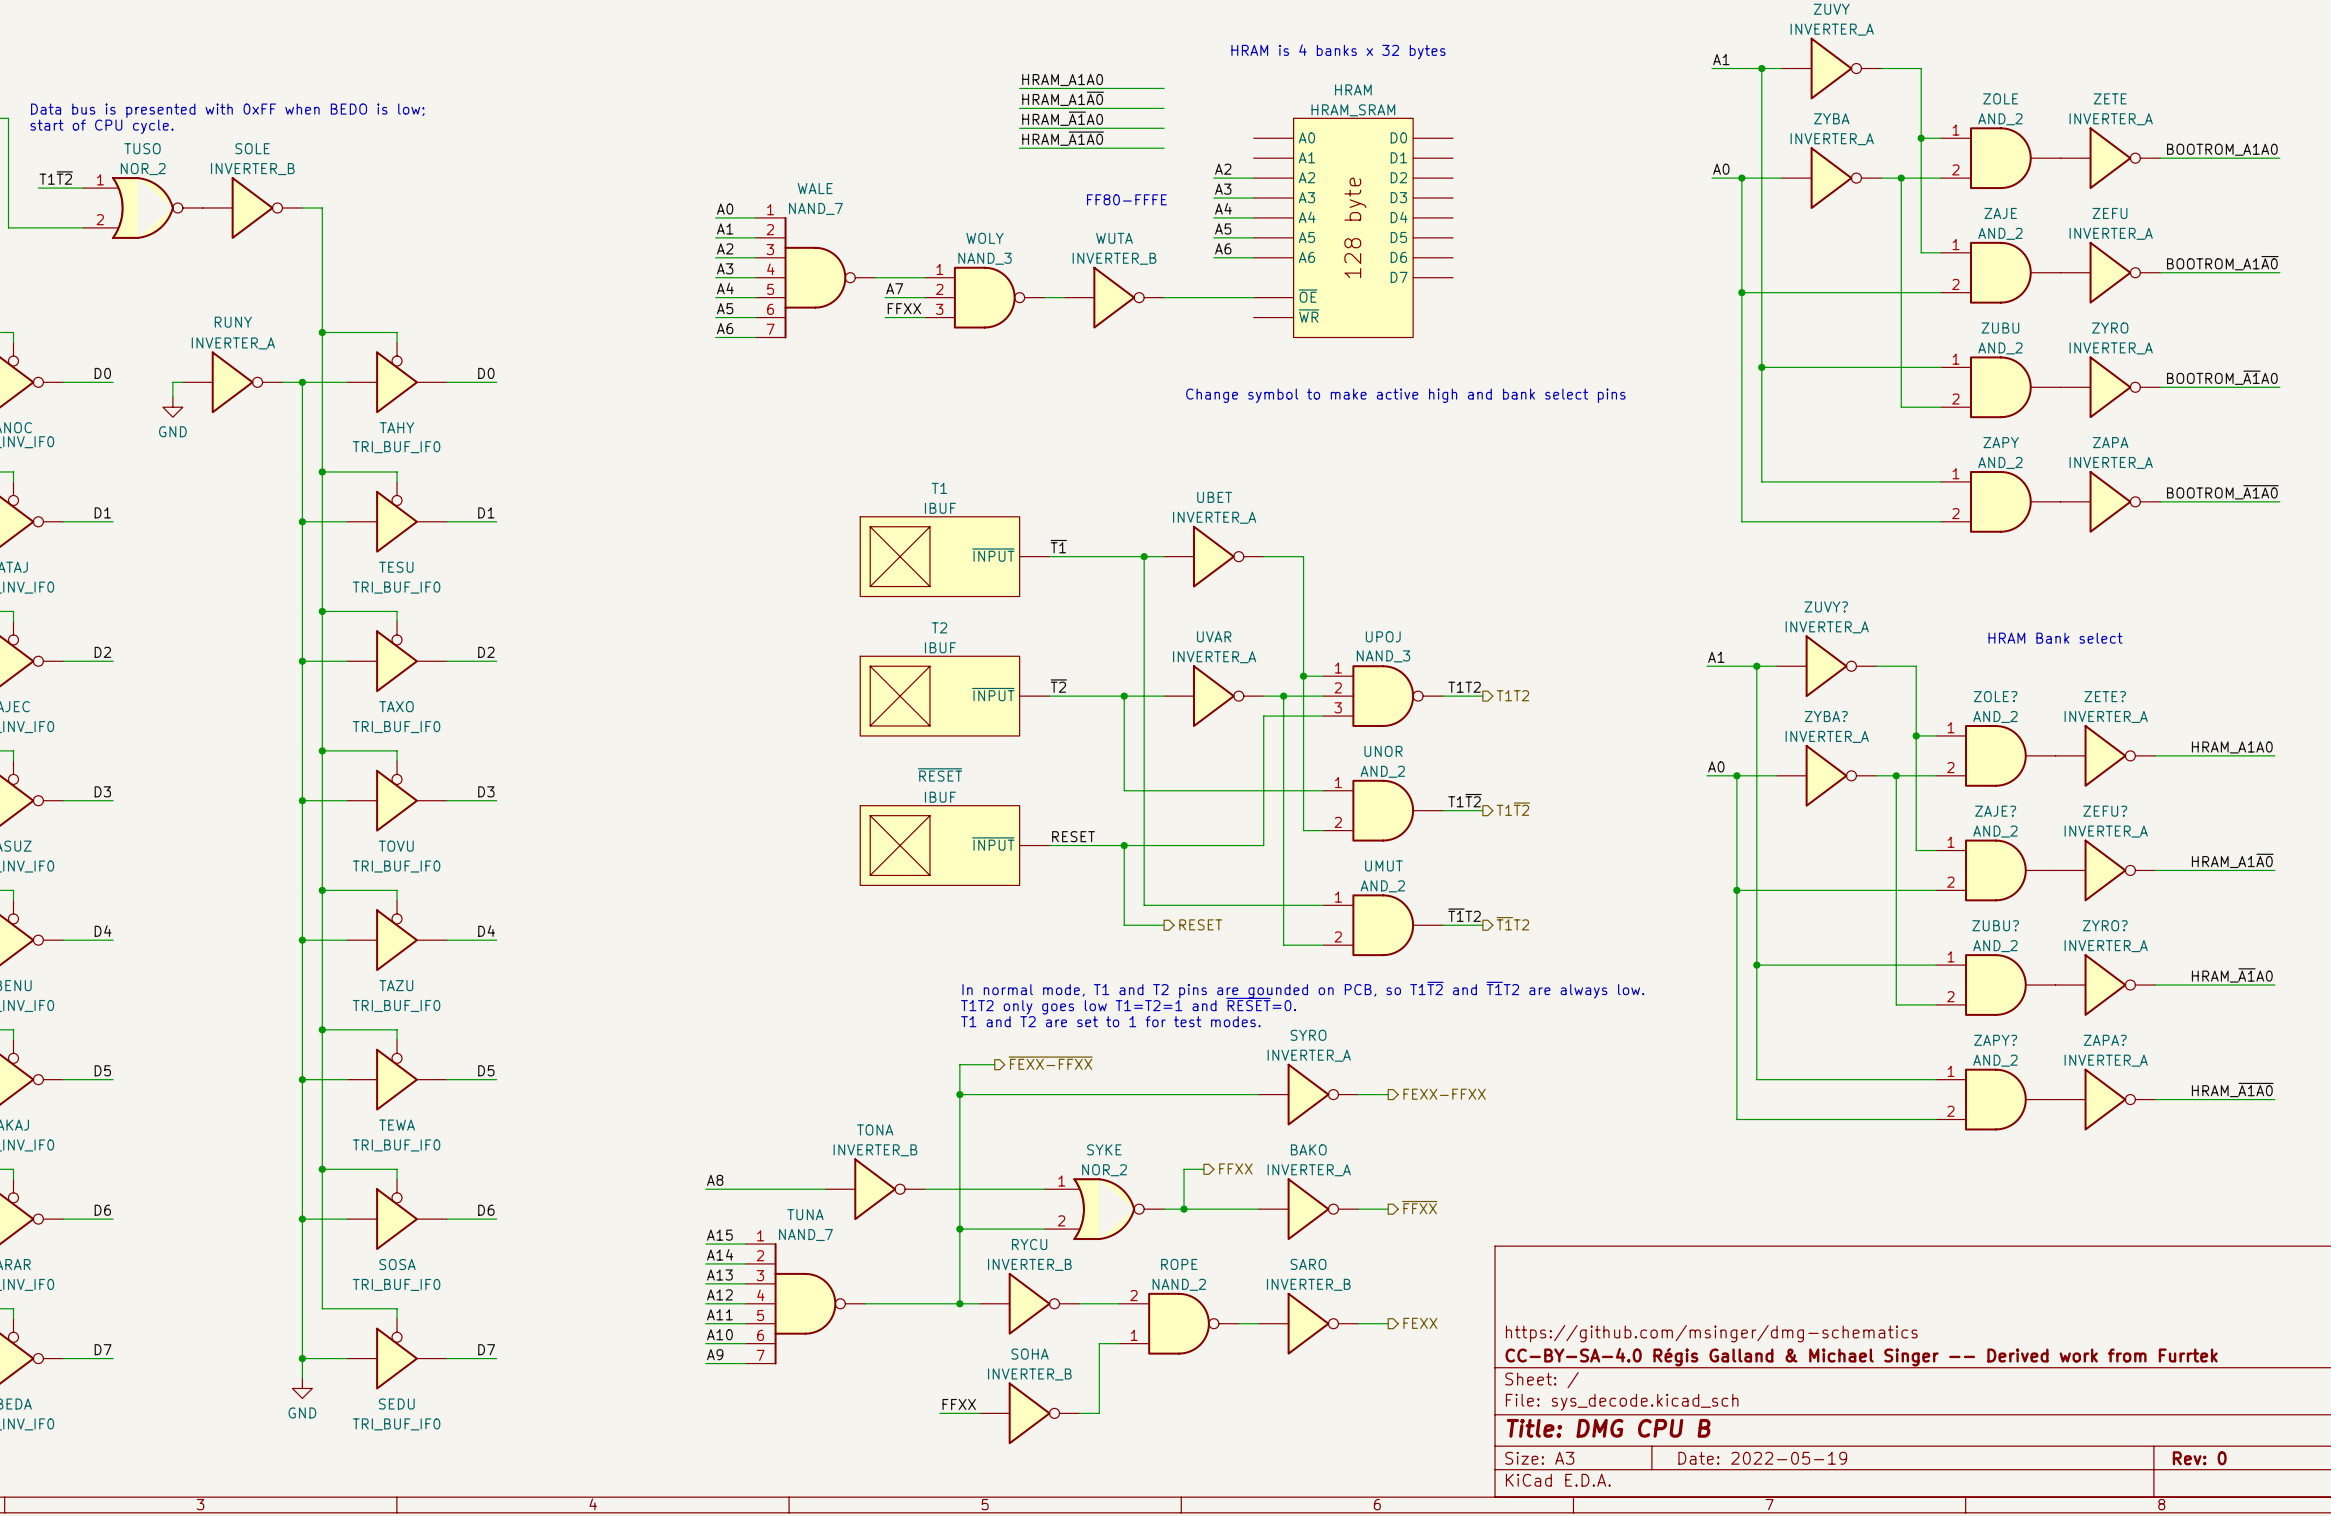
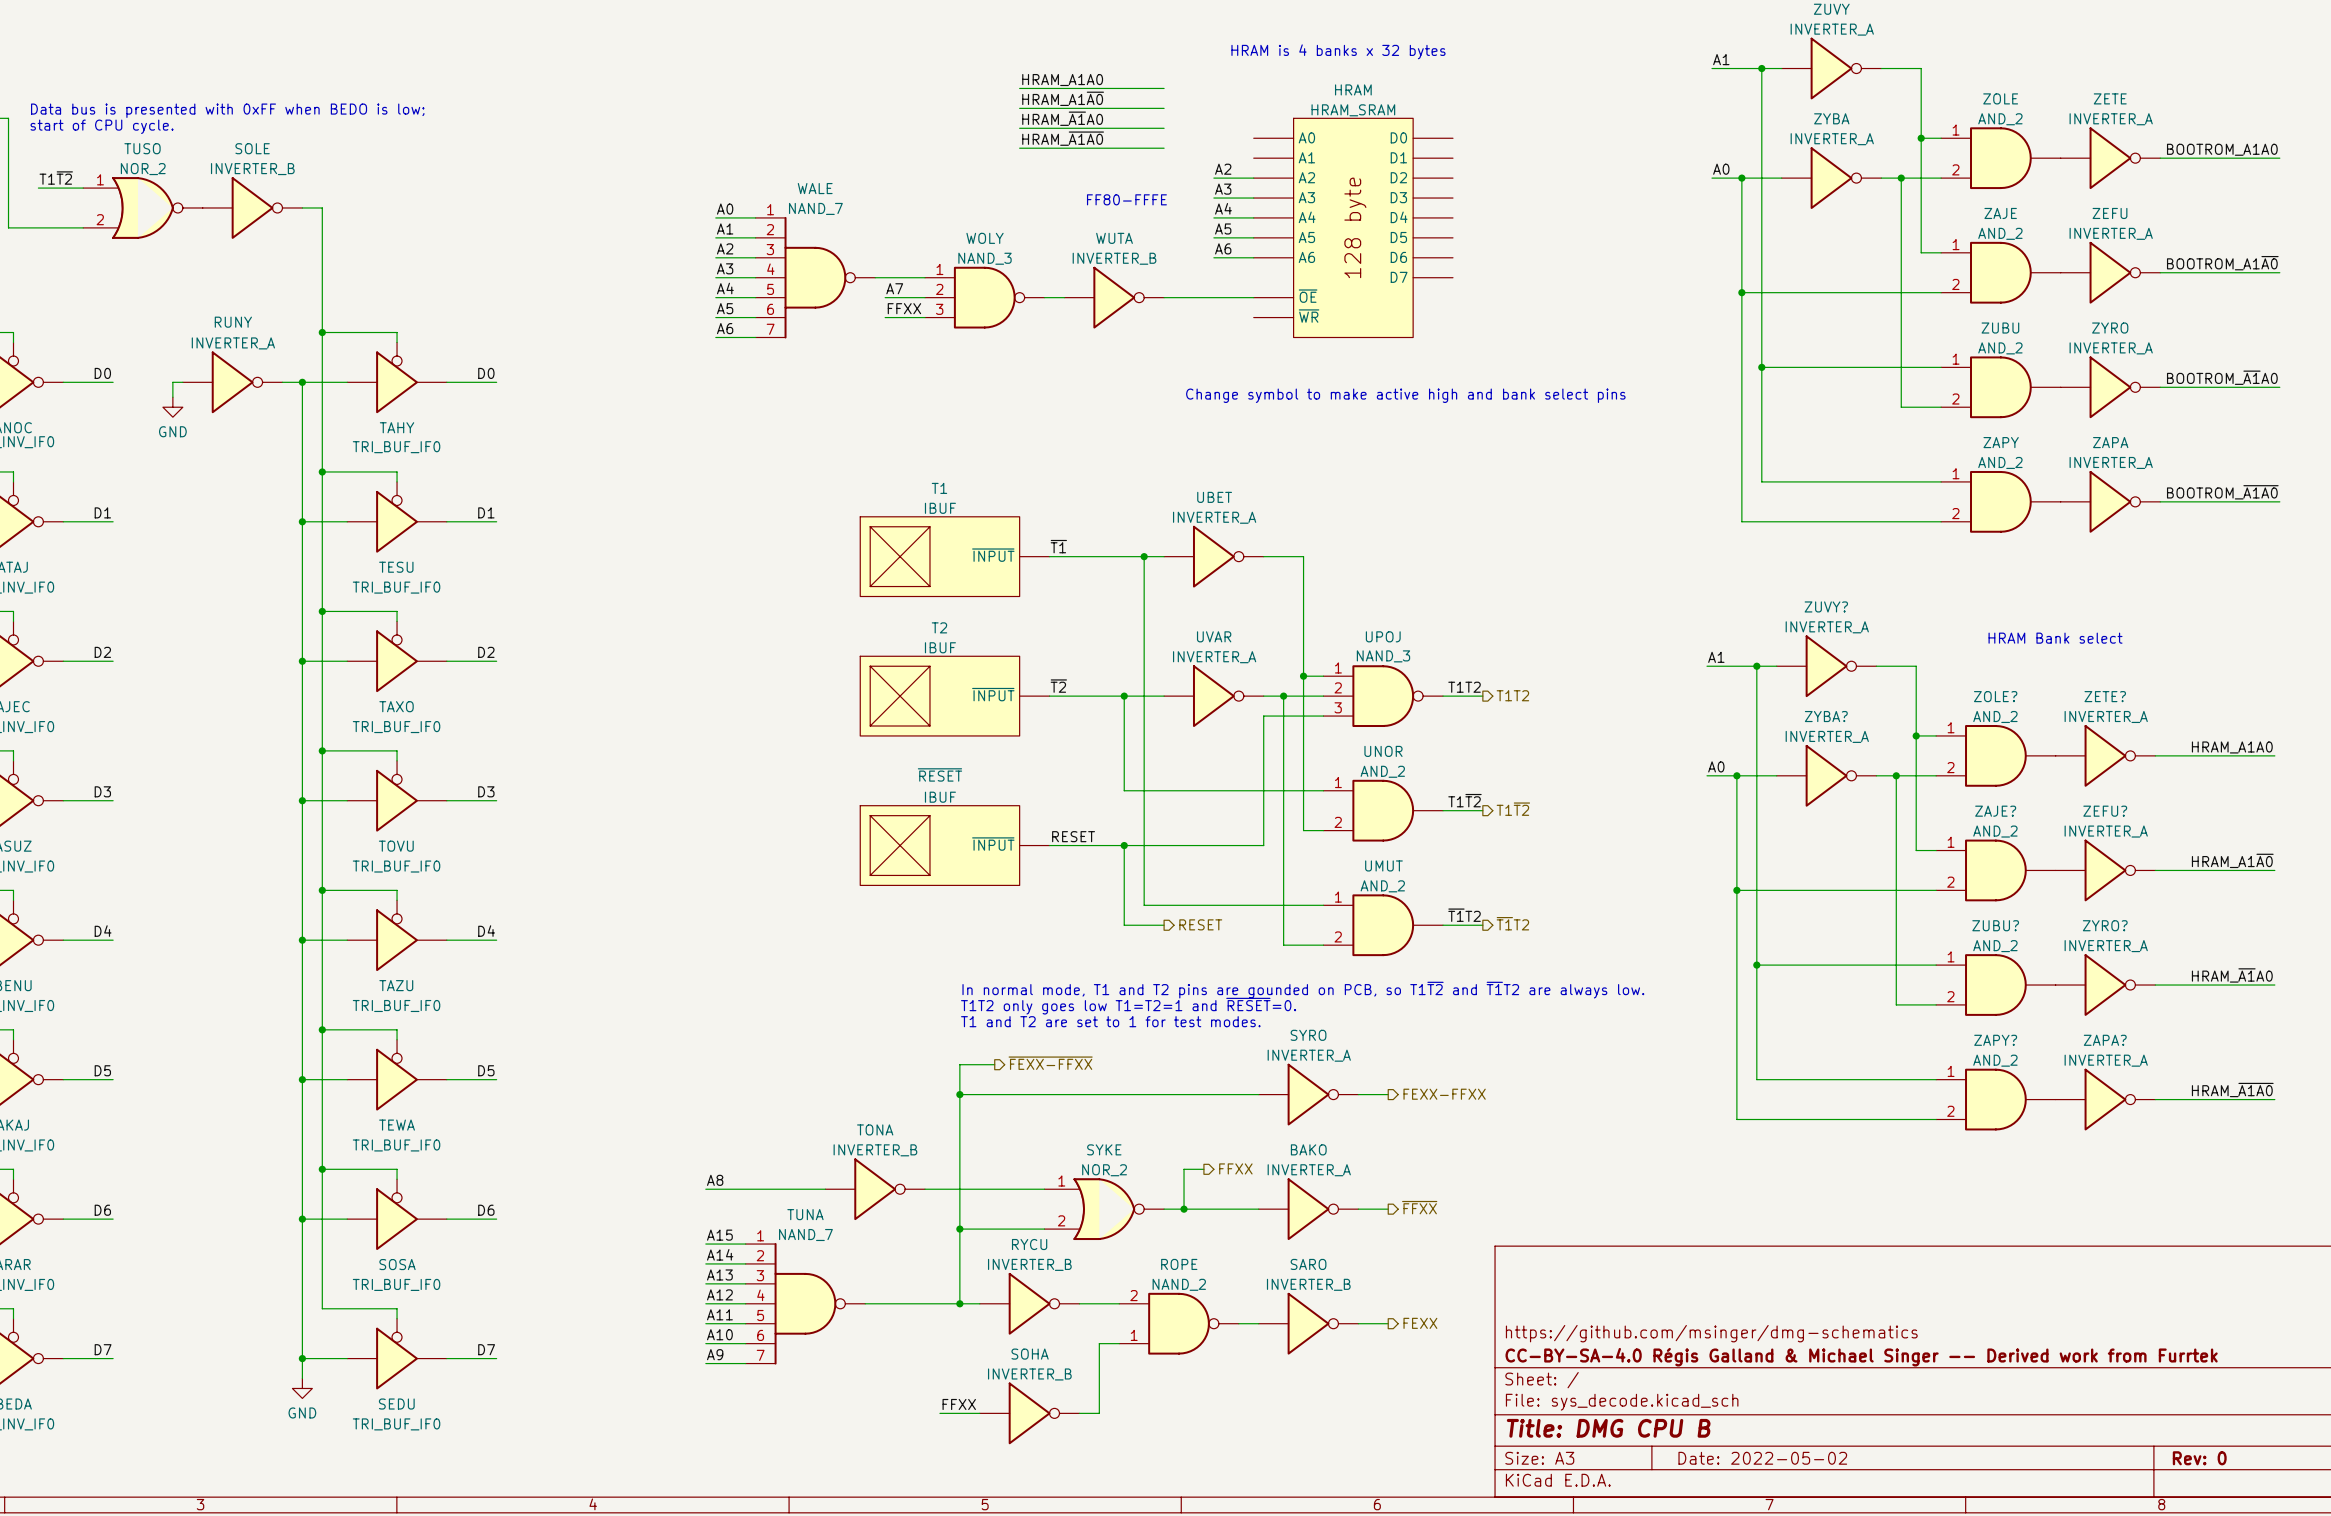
title block: Date: 2022-05-19 (1762, 1458) -> Date: 2022-05-02 (1762, 1458)

